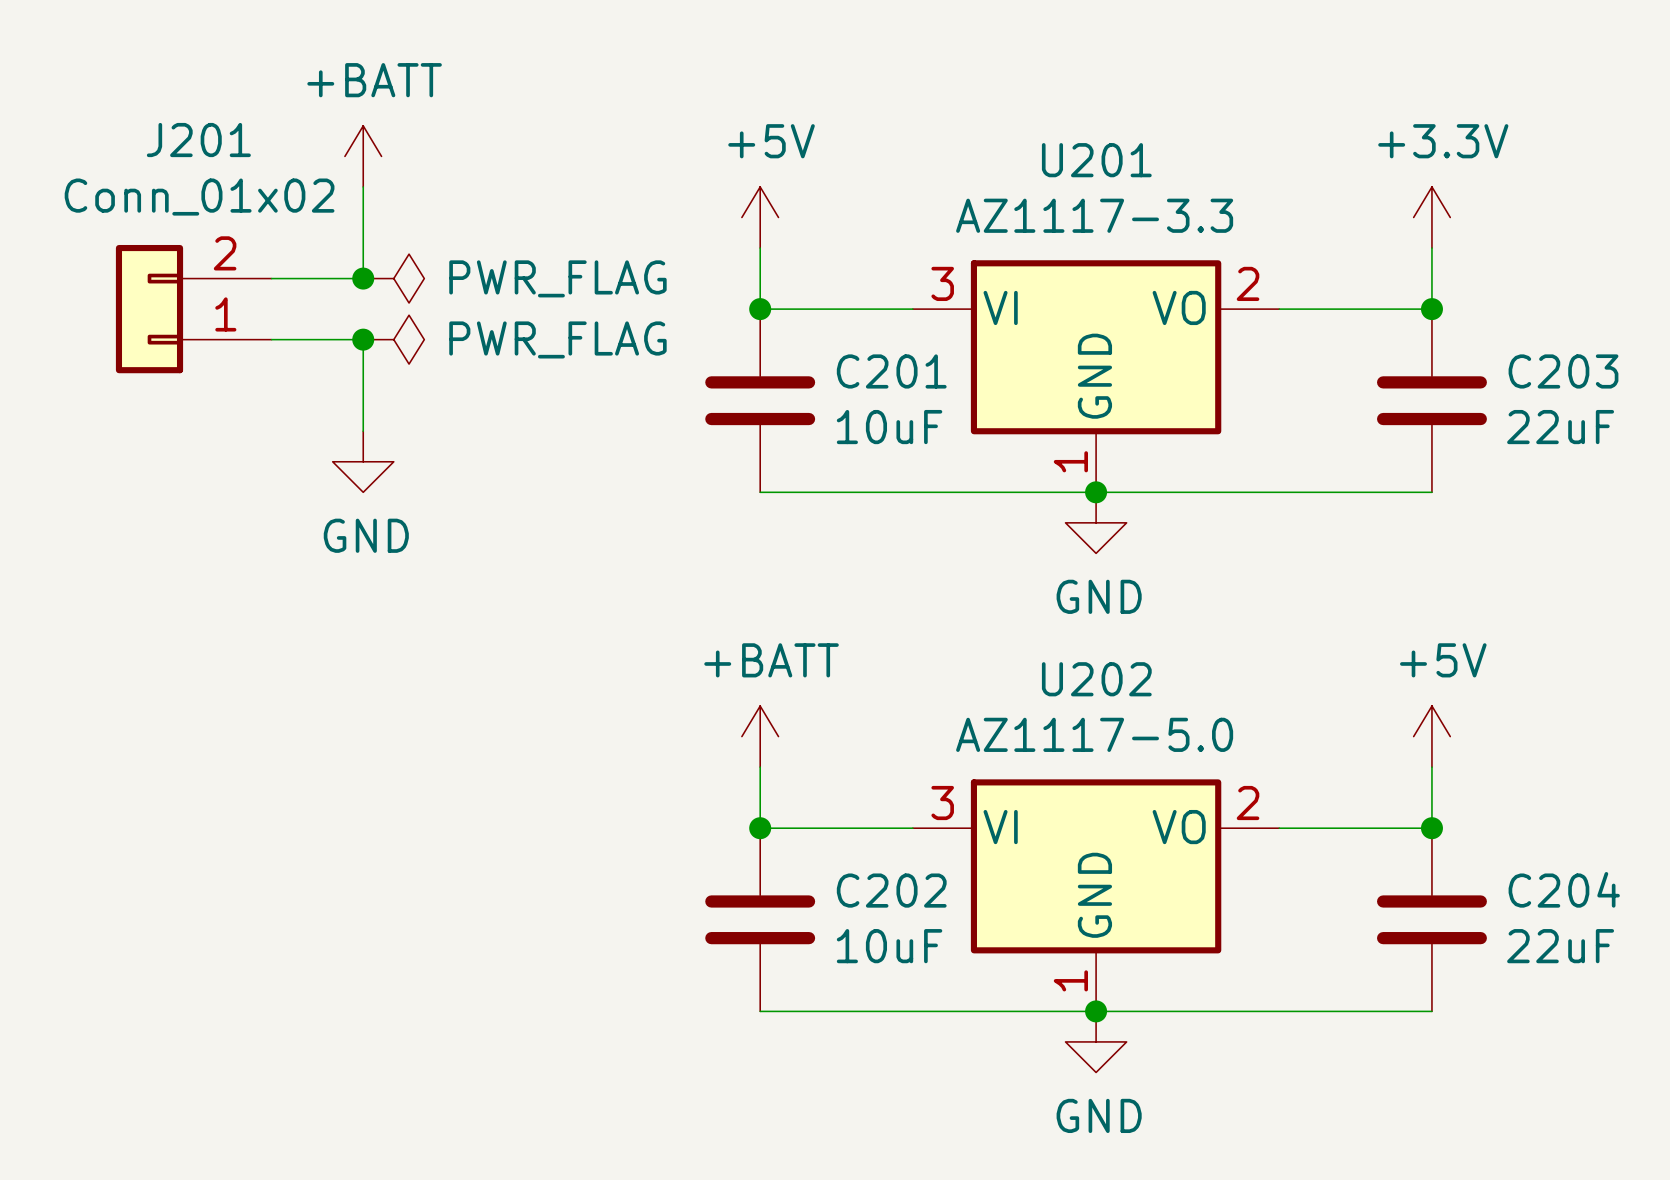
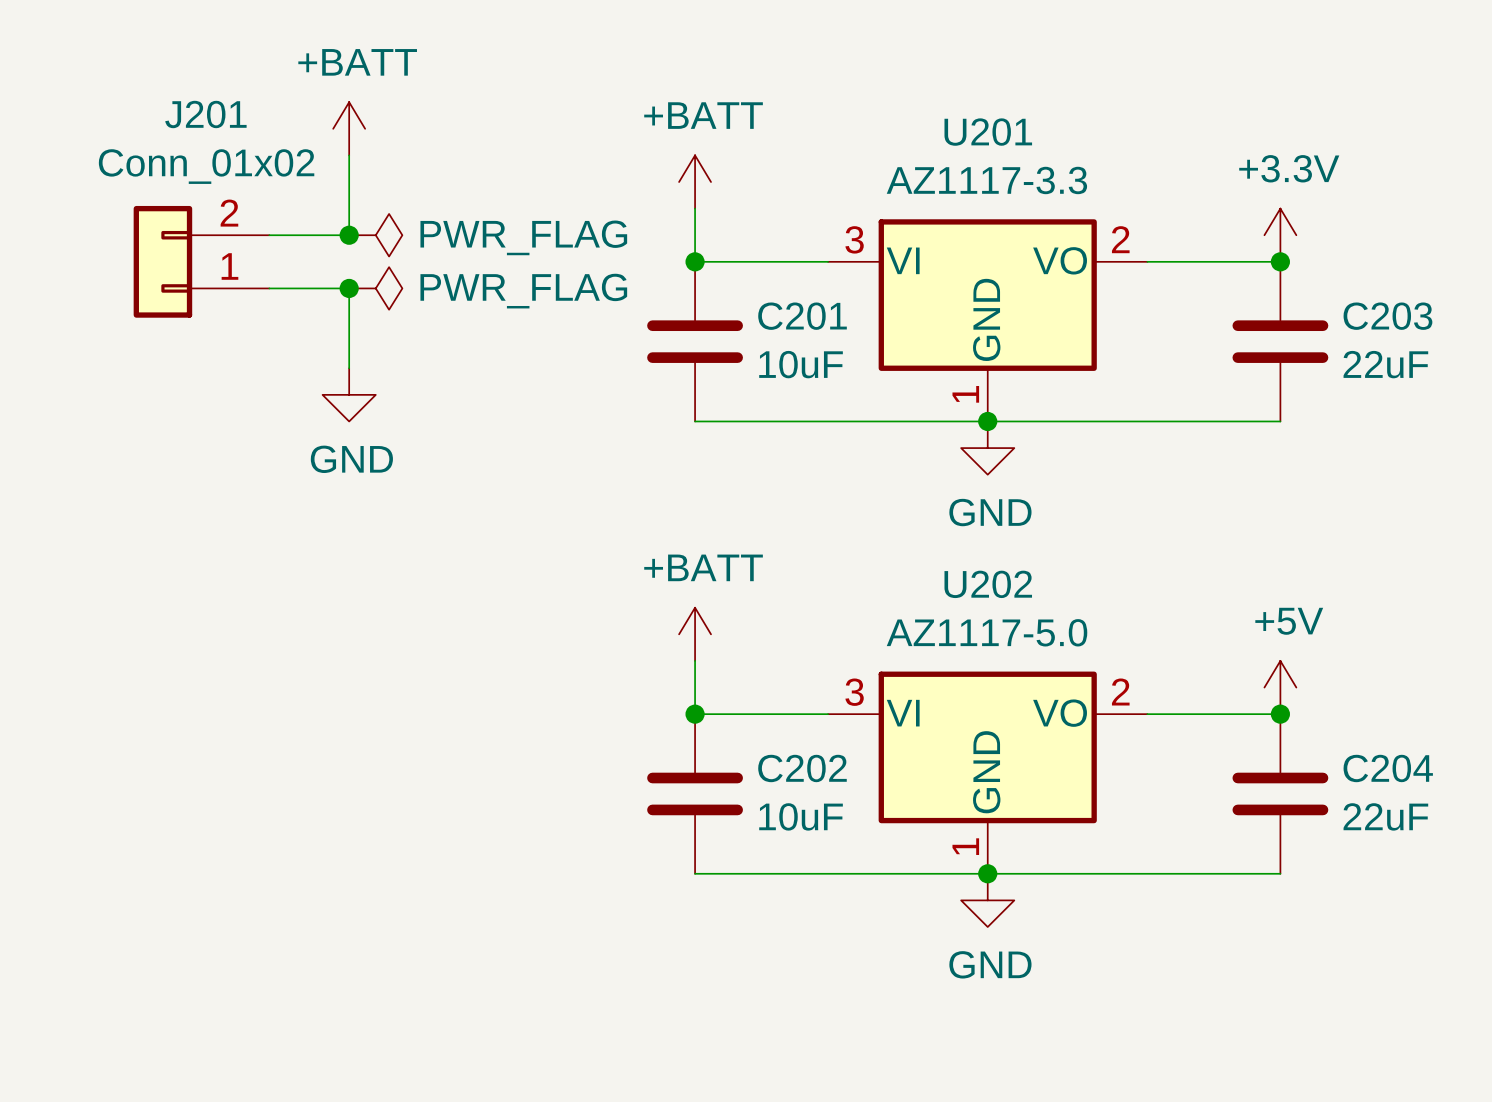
power symbol: +5V (760, 217) -> +BATT (695, 182)
power symbol position: +3.3V (1431, 217) -> +3.3V (1280, 235)
power symbol position: +5V (1431, 736) -> +5V (1280, 687)

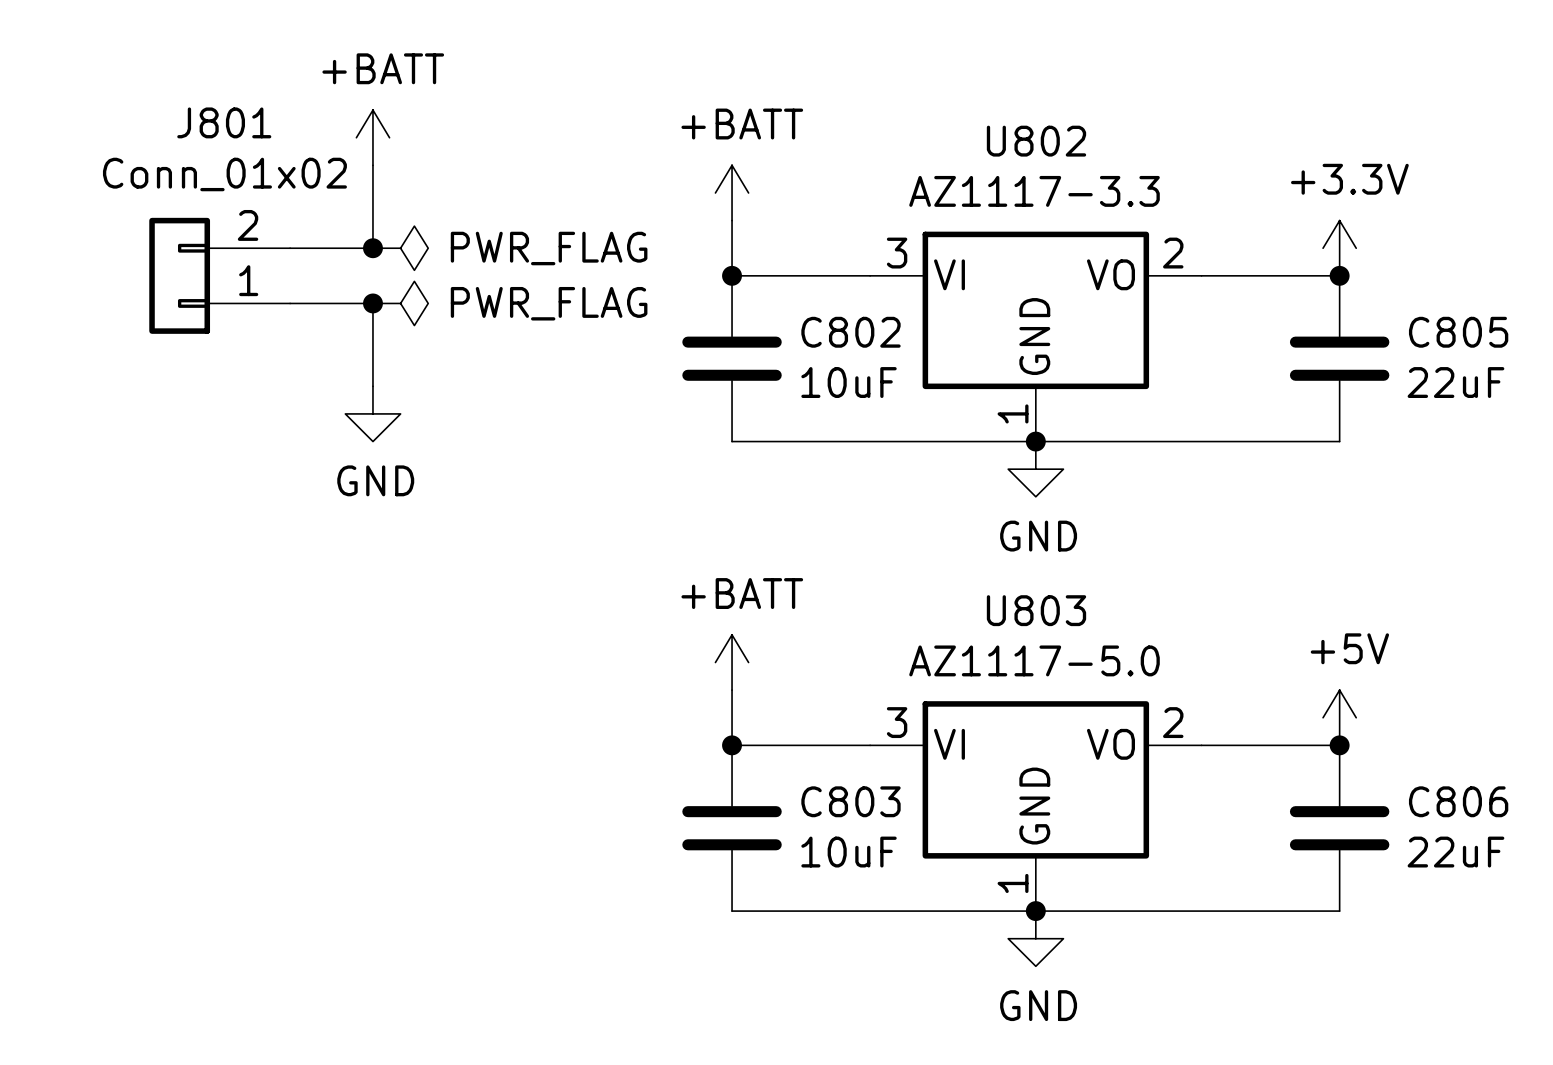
J201 name: J201 (205, 114) -> J801 (224, 122)
U201 name: U201 (988, 132) -> U802 (1036, 141)
C201 name: C201 (802, 316) -> C802 (850, 332)
C203 name: C203 (1387, 316) -> C805 (1458, 332)
U202 name: U202 (988, 584) -> U803 (1036, 610)
C202 name: C202 (802, 768) -> C803 (850, 801)
C204 name: C204 (1388, 768) -> C806 (1458, 801)

